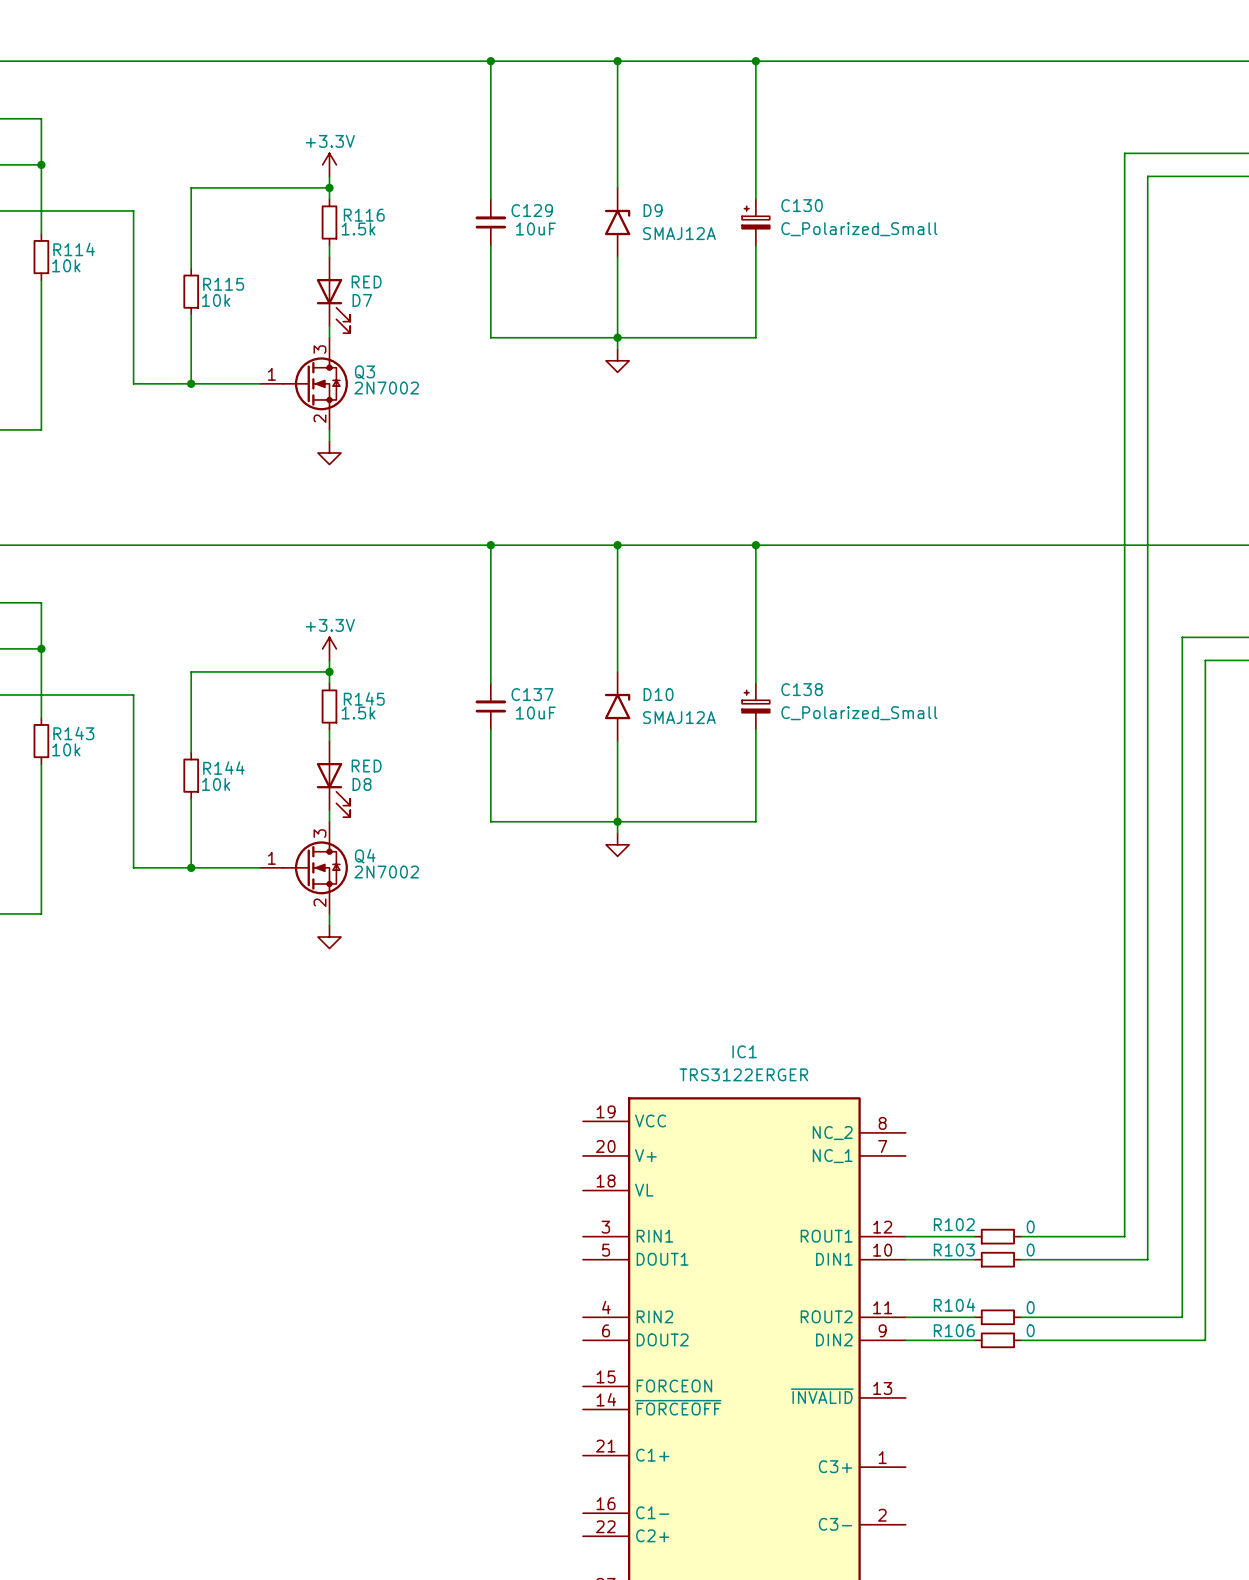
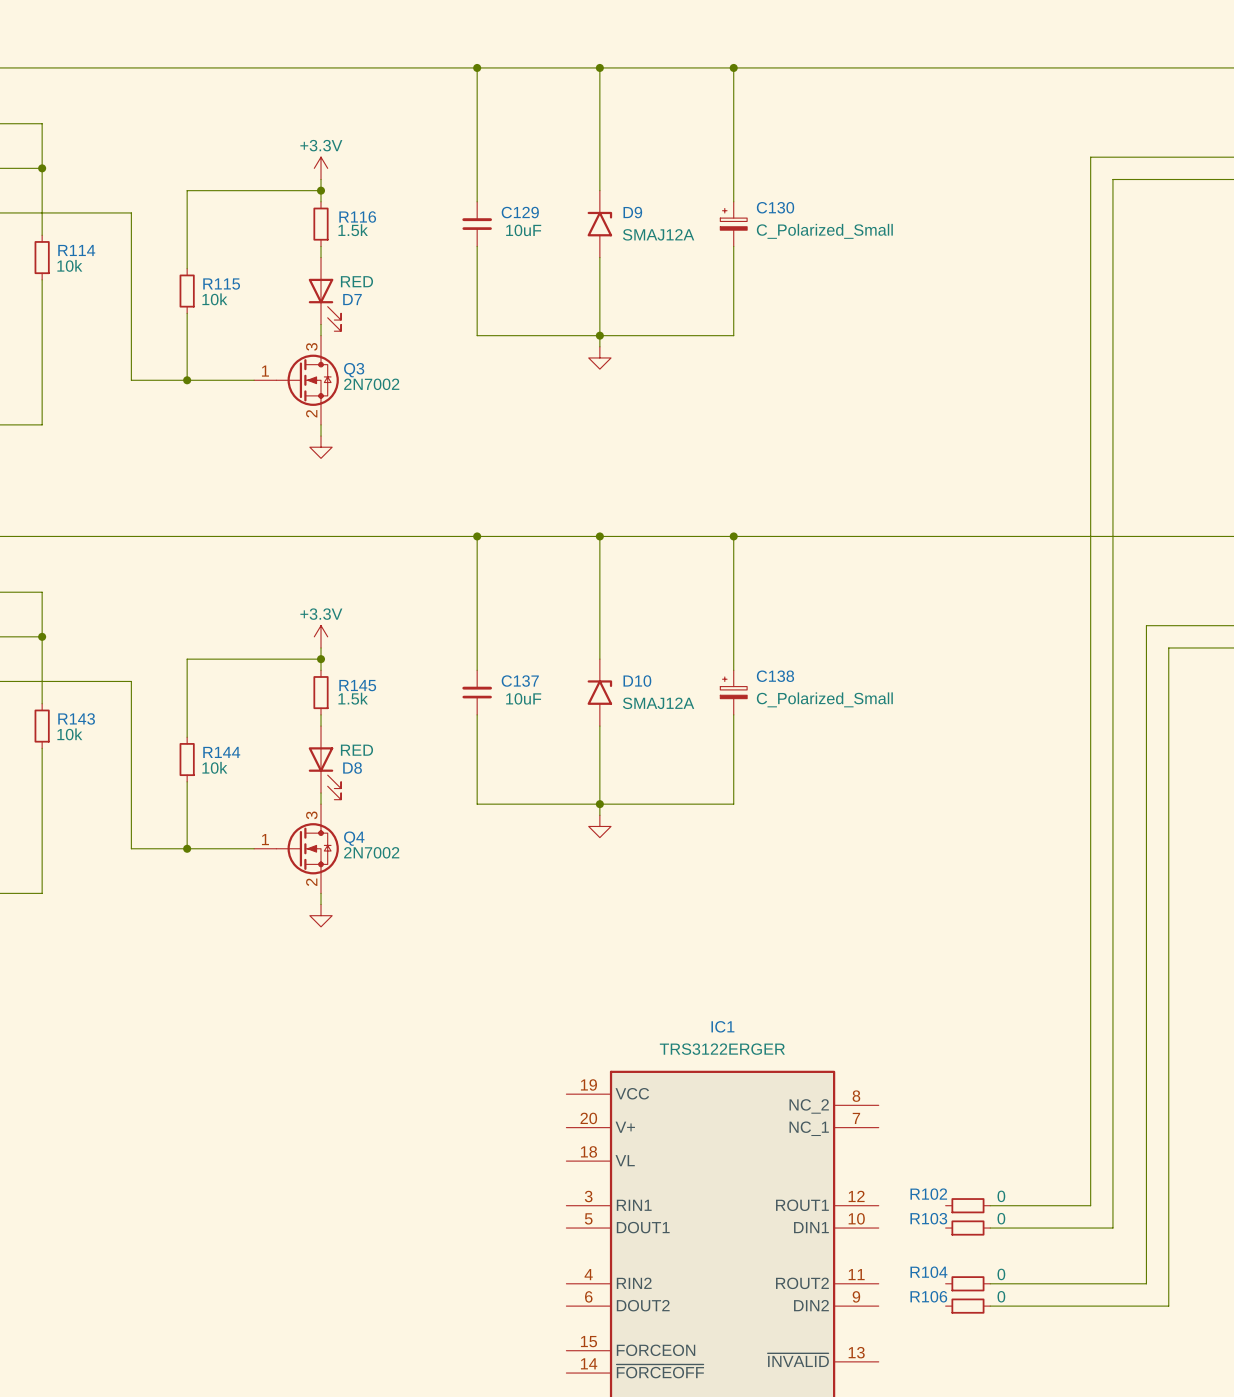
wire: (905, 1236) (974, 1236) -> none
wire: (905, 1259) (974, 1259) -> none
wire: (905, 1317) (974, 1317) -> none
wire: (905, 1340) (974, 1340) -> none

